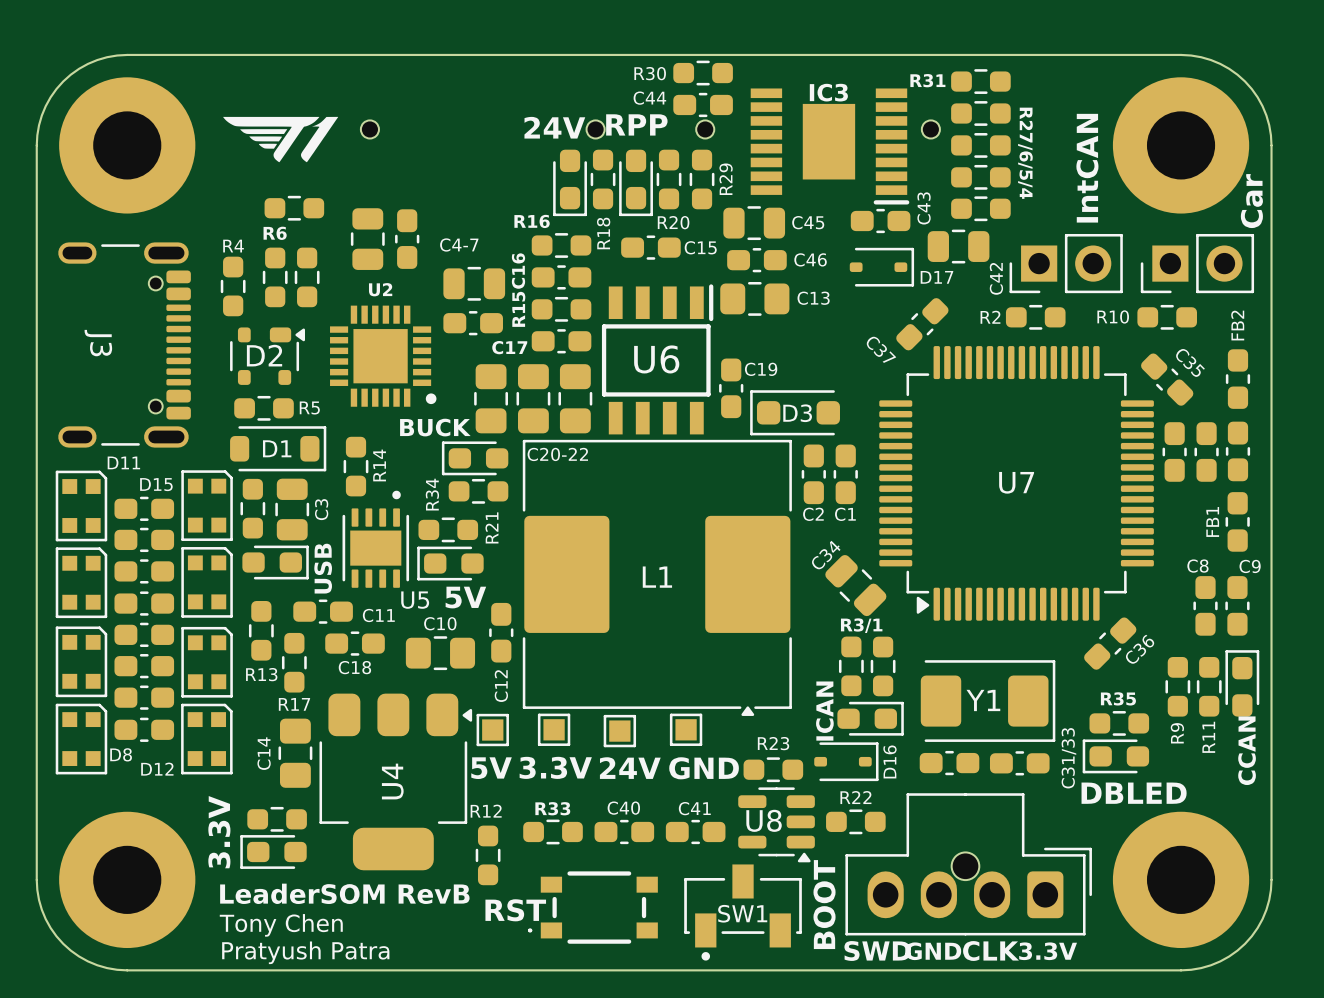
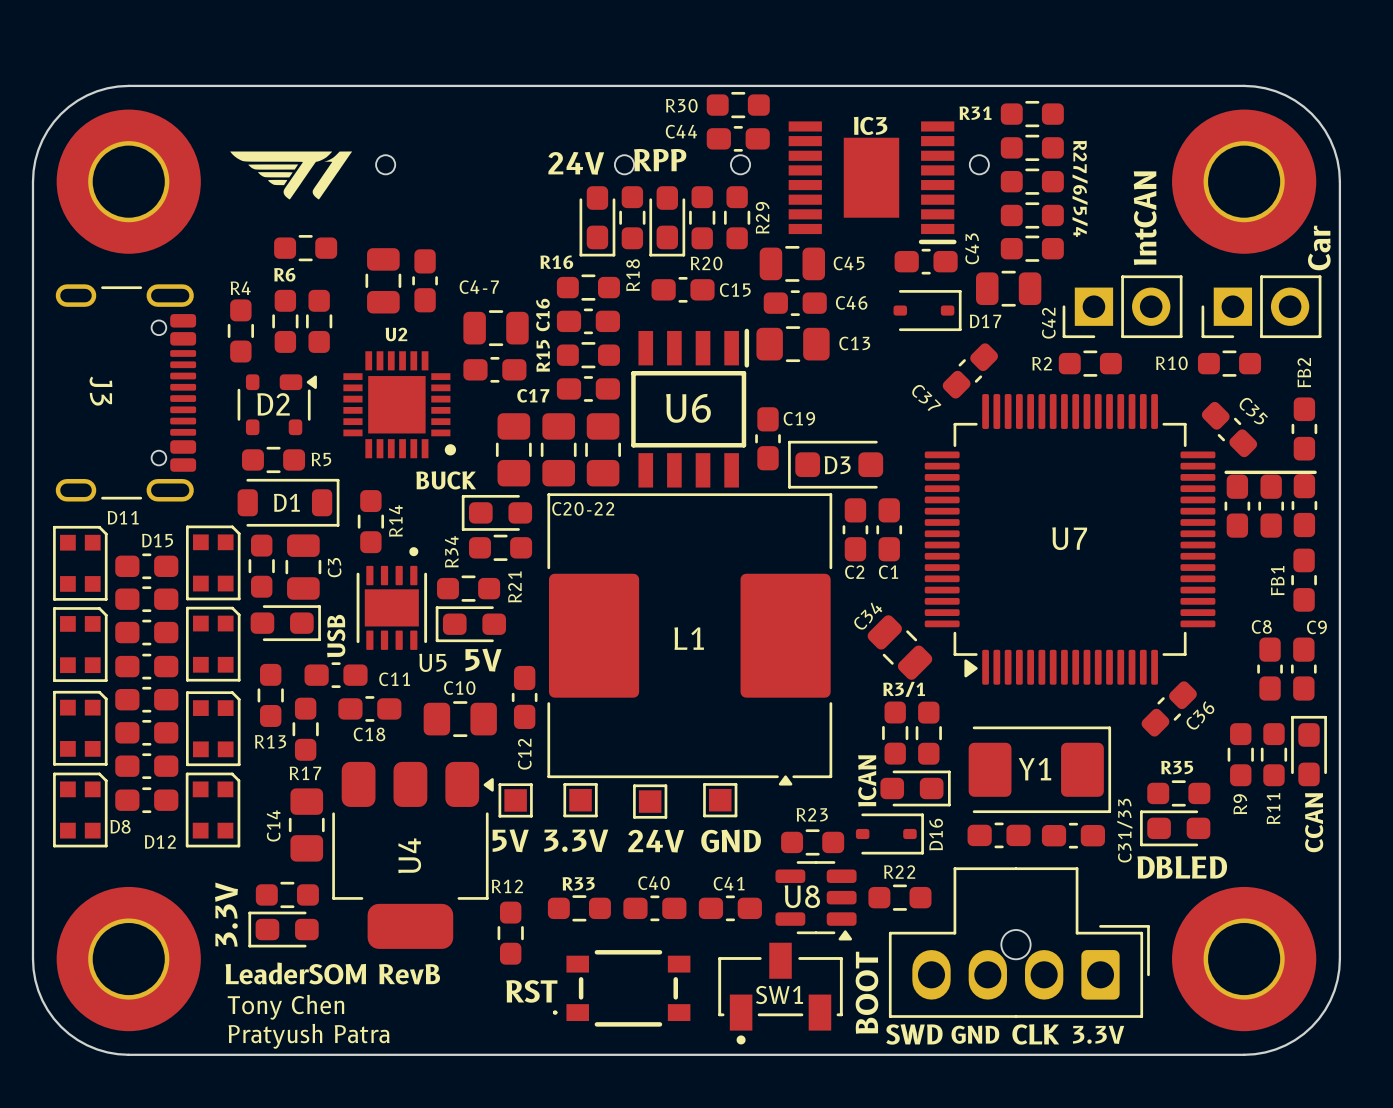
line: none -> (1226, 472) (1315, 472)

